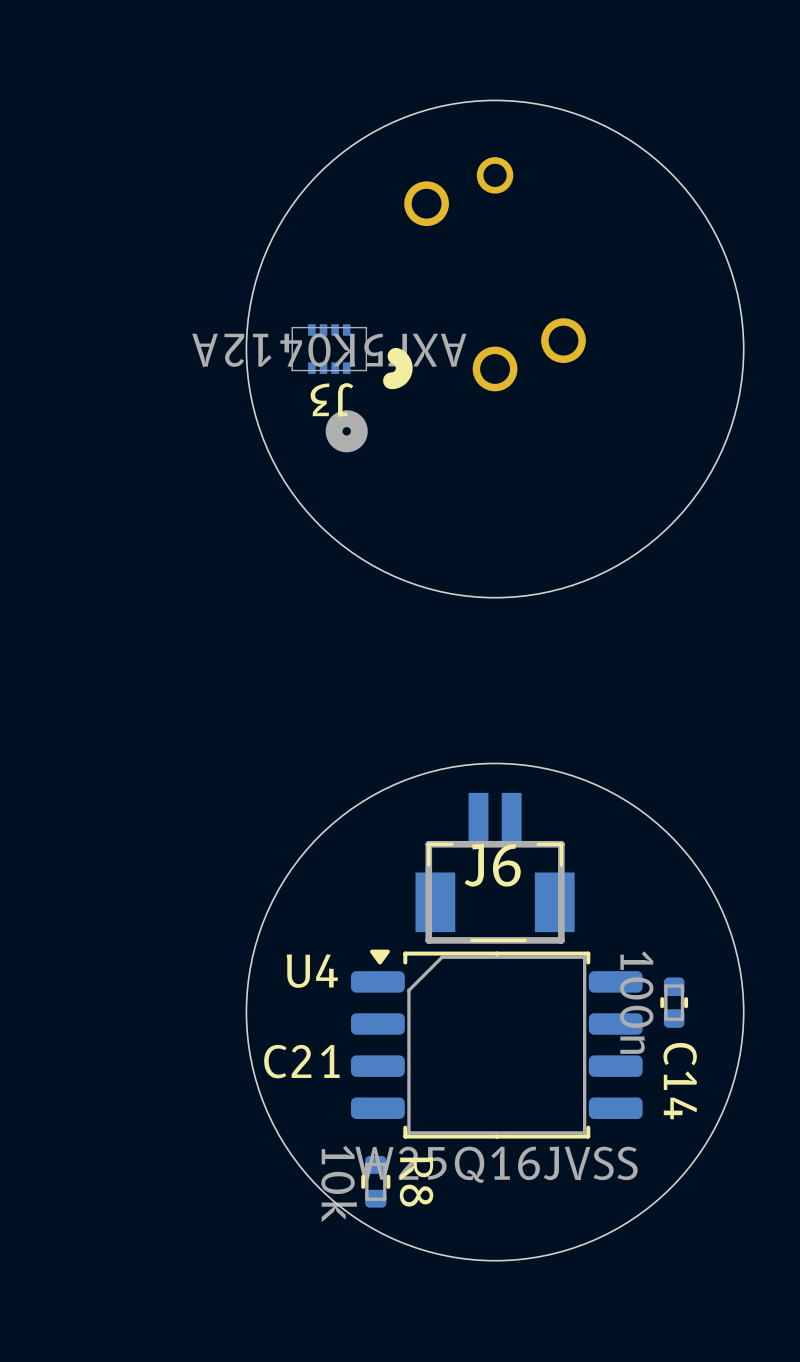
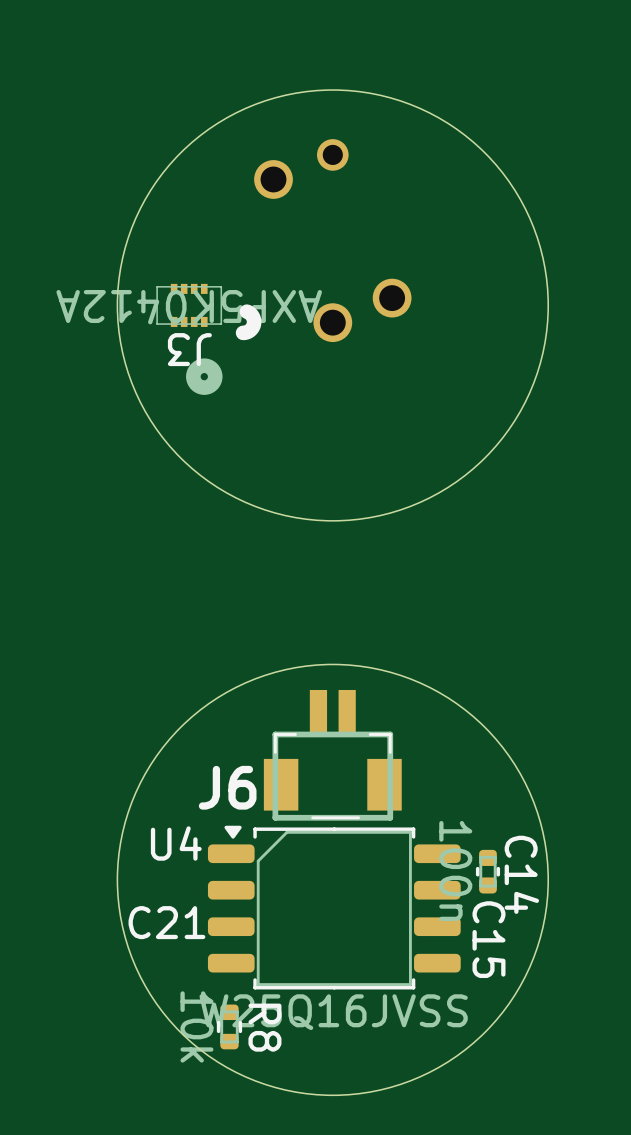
J6 name position: J6 (492, 865) -> J6 (227, 787)
C15: none -> (488, 939)
C14 name position: C14 (680, 1081) -> C14 (521, 874)

